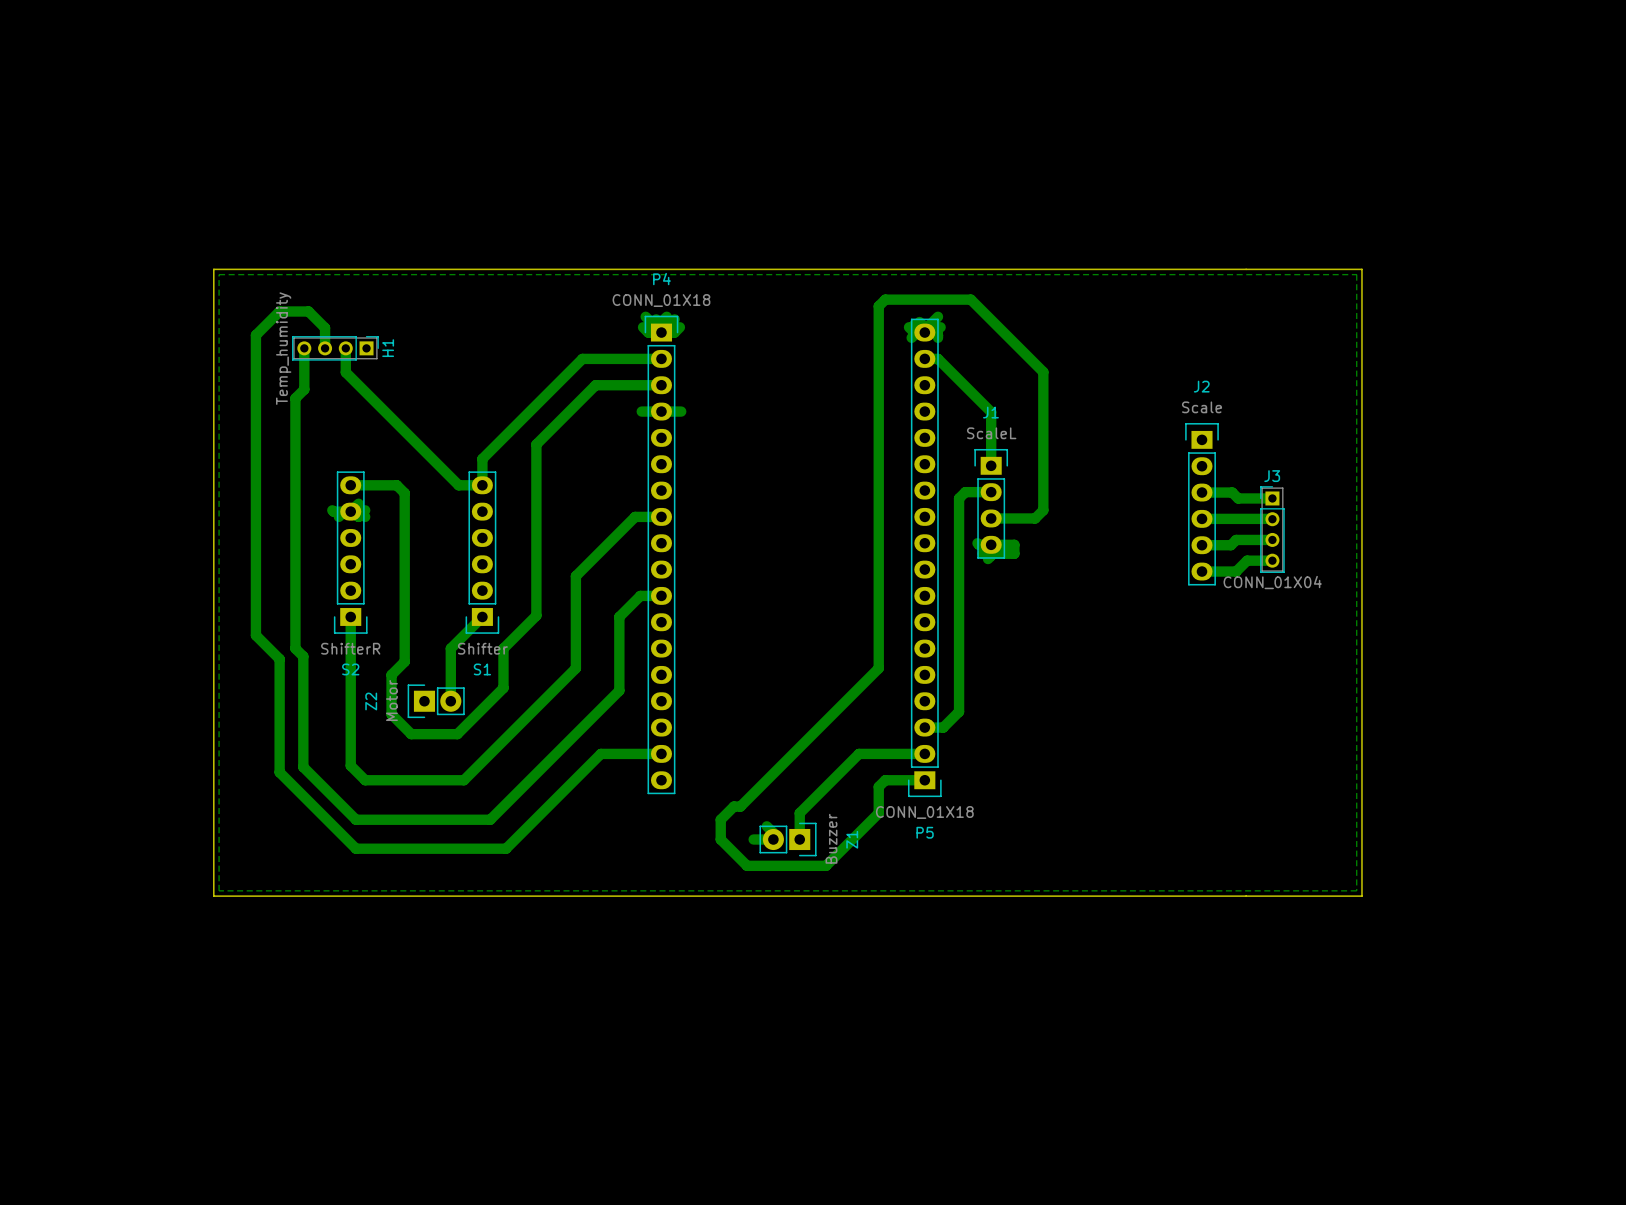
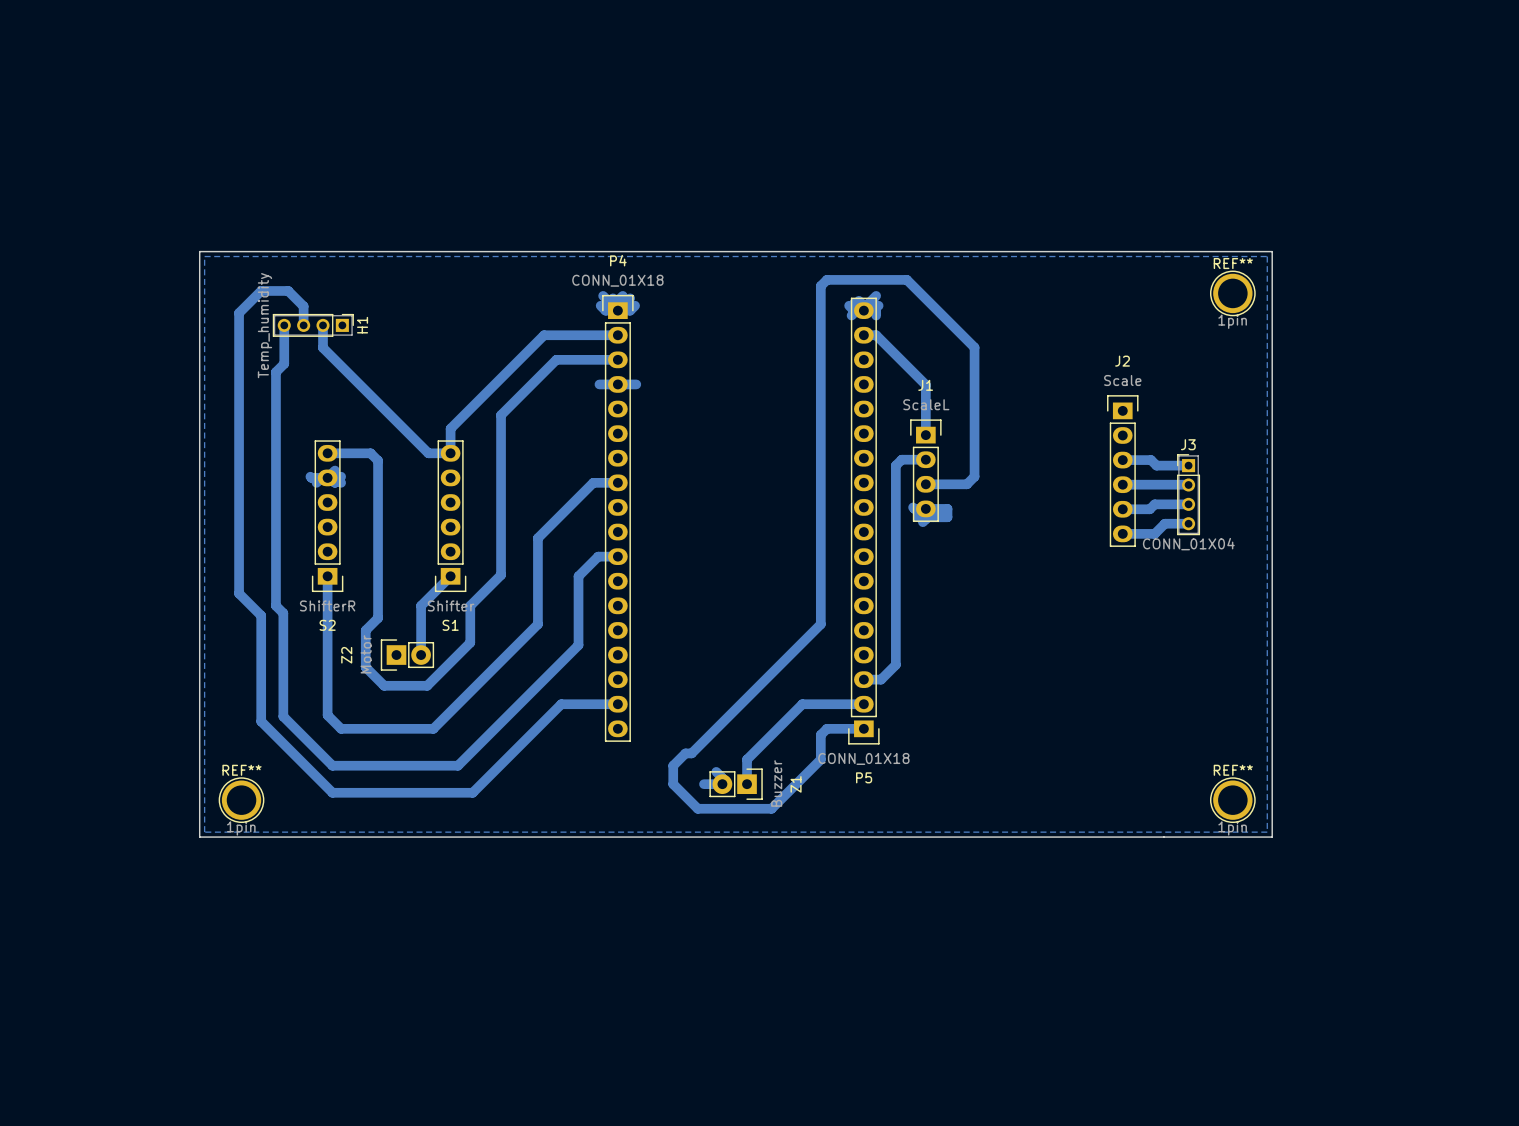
REF**: none -> 1pin (1232, 293)
REF**: none -> 1pin (241, 800)
REF**: none -> 1pin (1232, 800)

